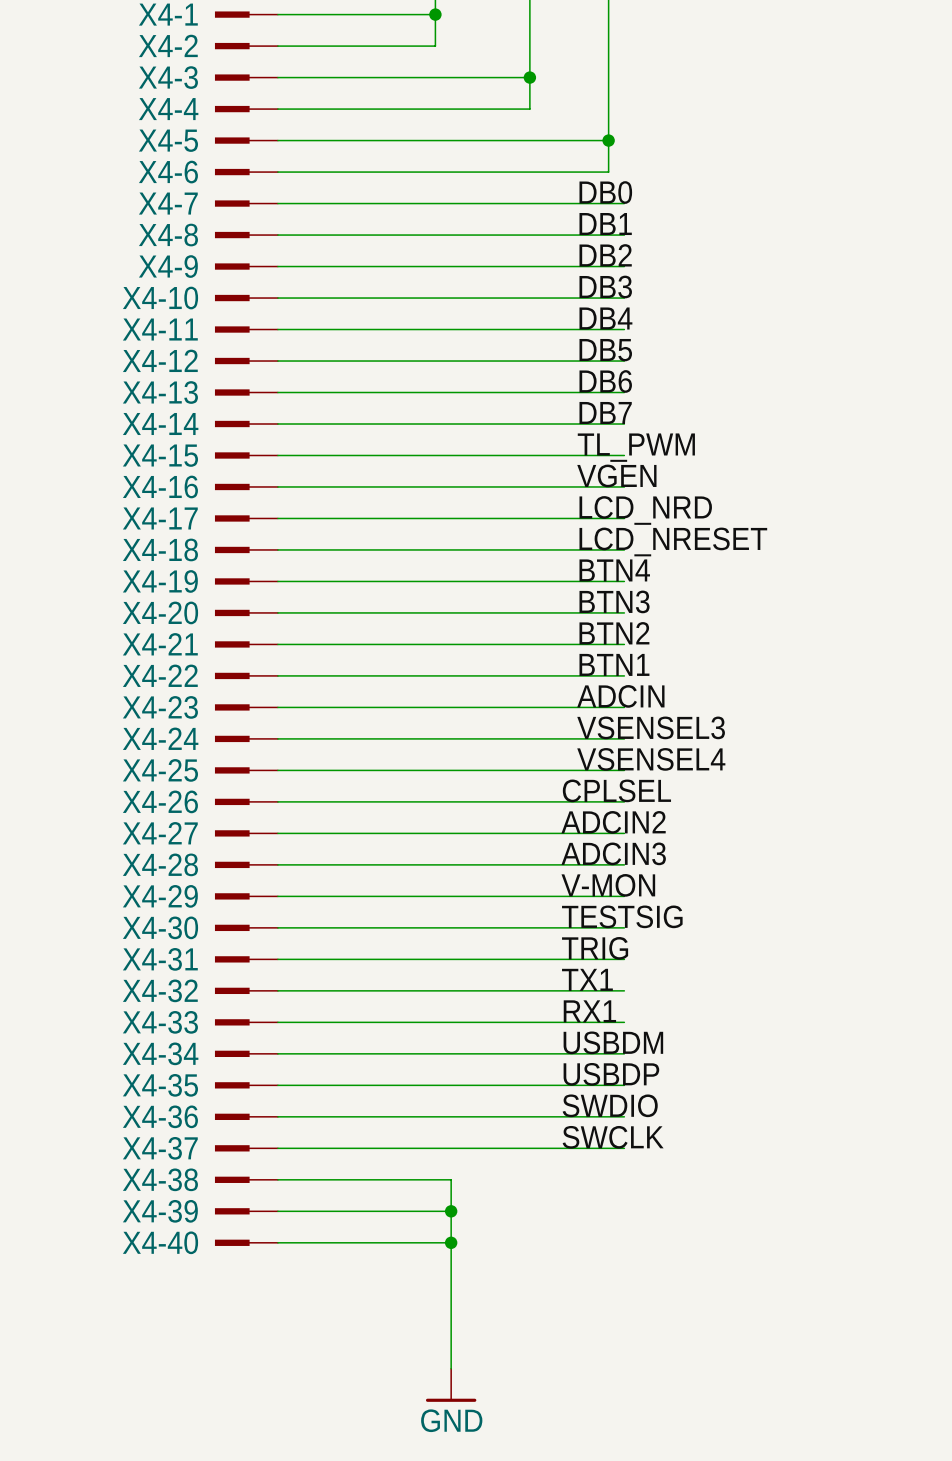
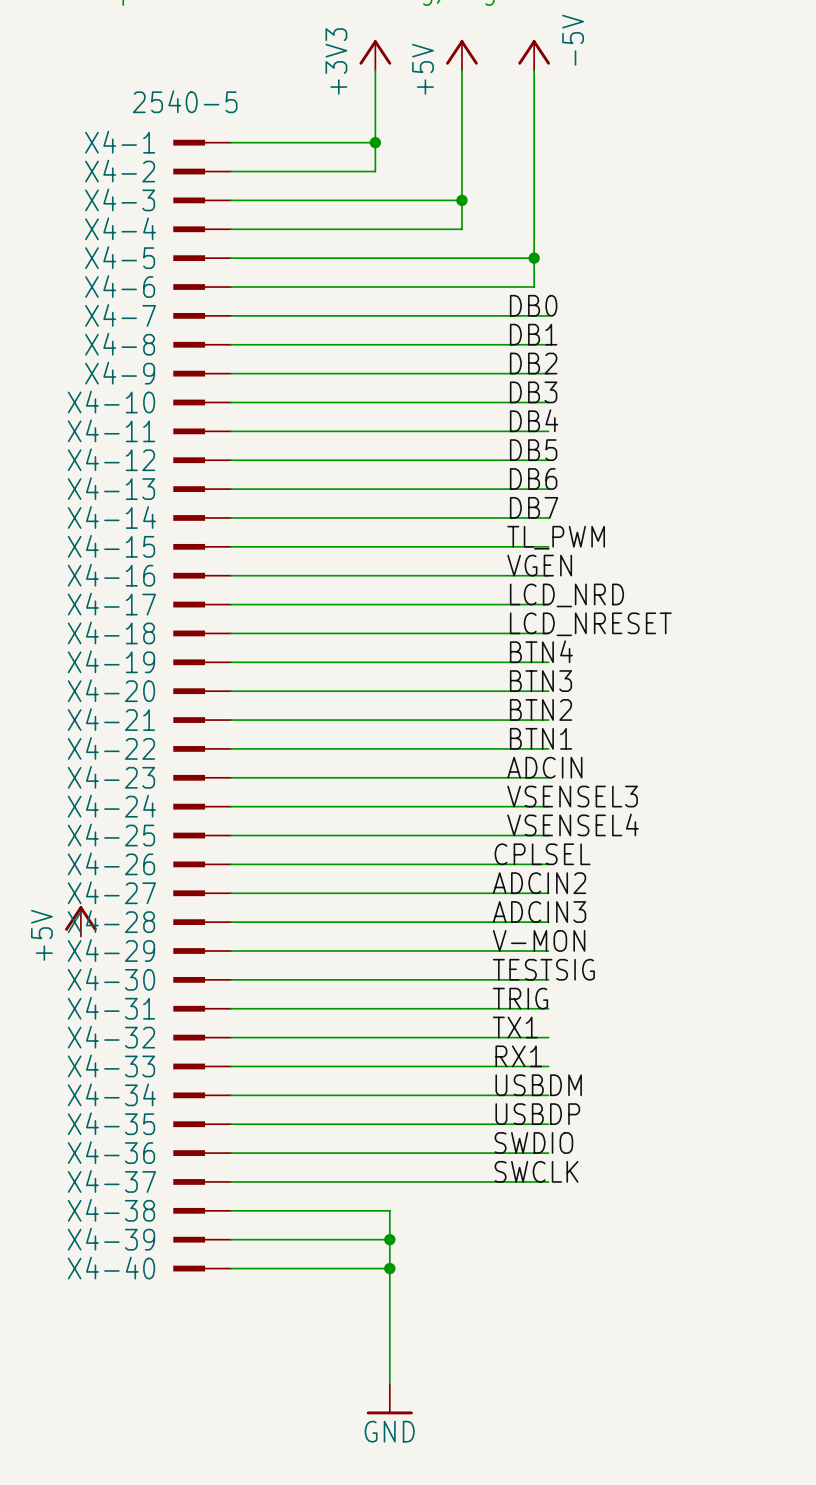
power symbol: none -> +5V (80, 921)

